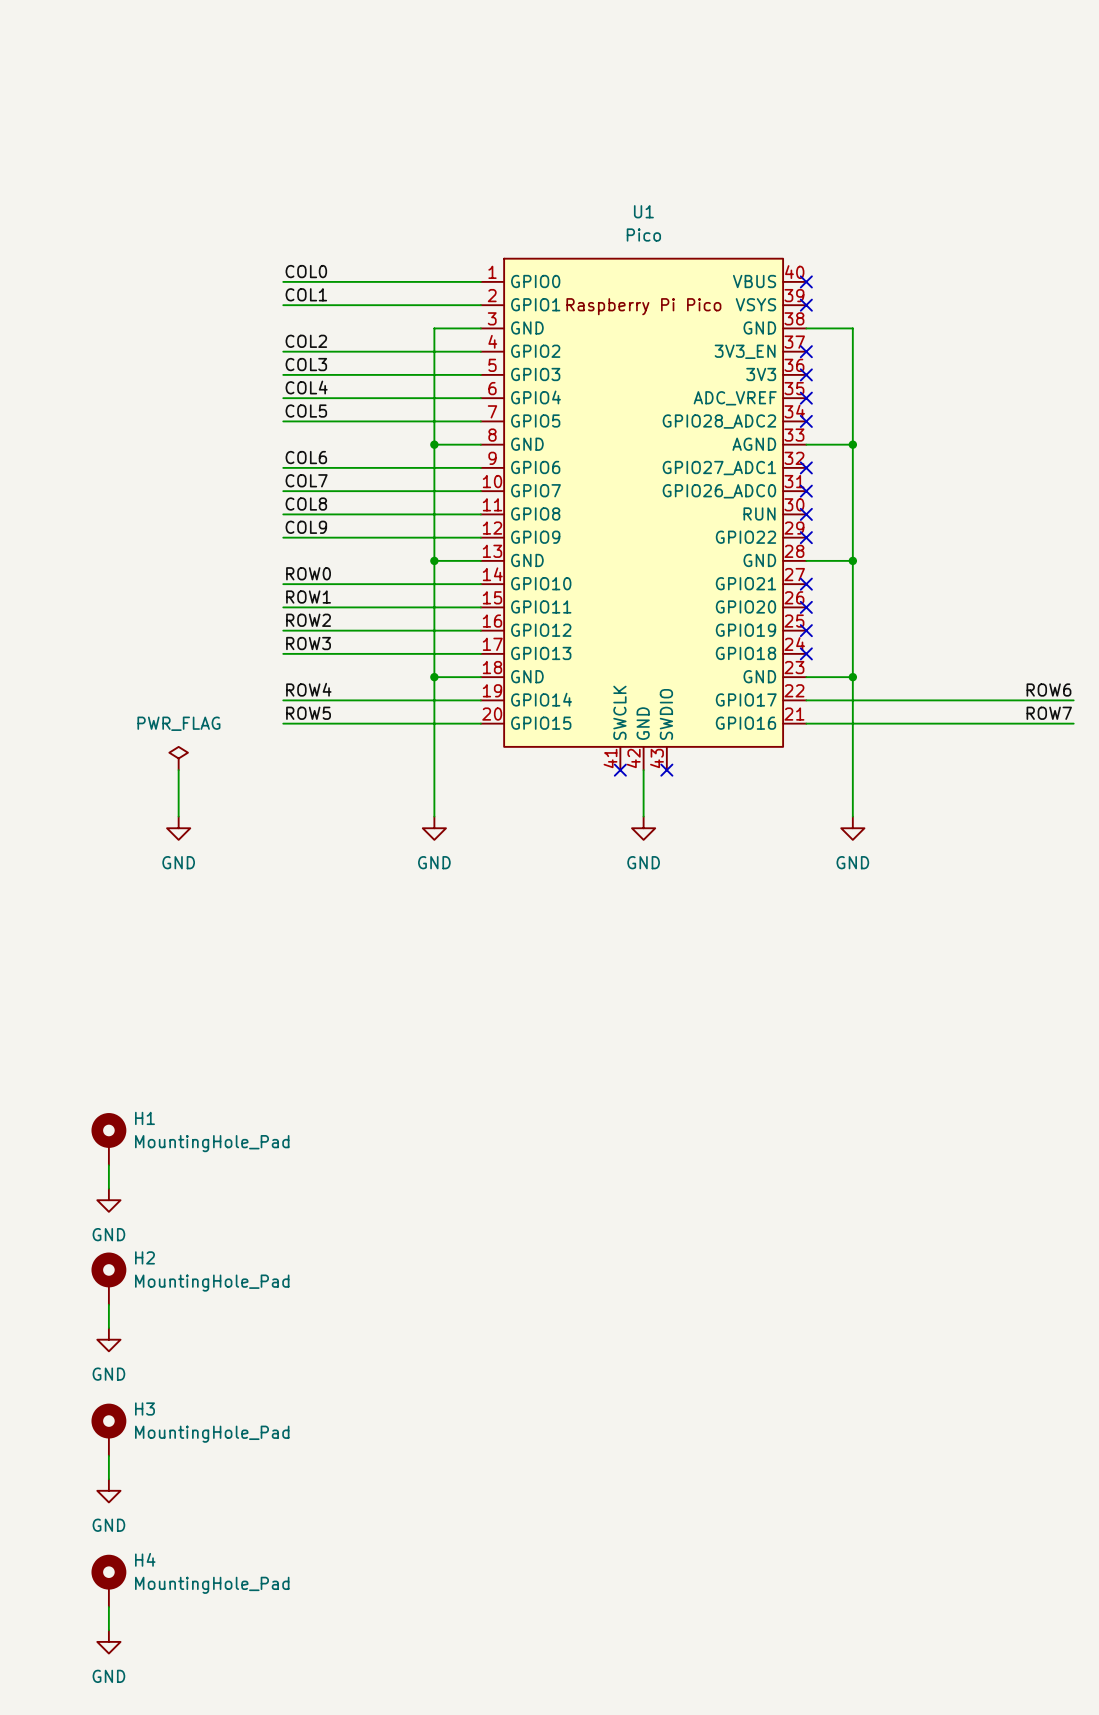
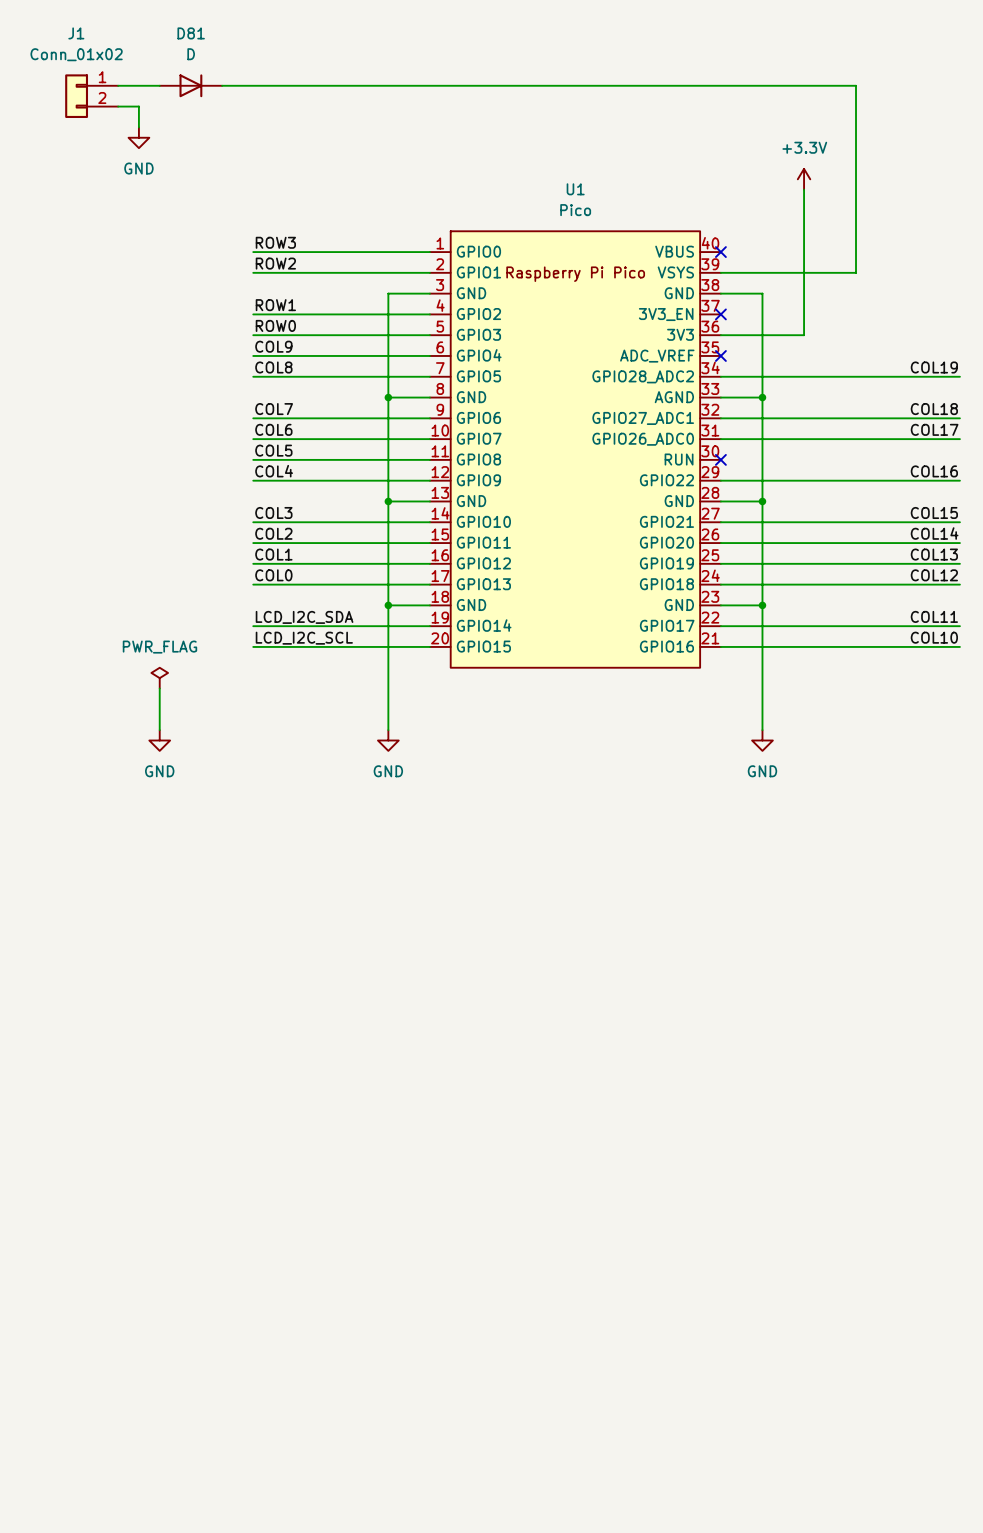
wire: none -> (118, 85) (159, 85)
D81: none -> D (190, 85)
wire: none -> (222, 85) (856, 85) (856, 272) (720, 272)
J1: none -> Conn_01x02 (91, 96)
wire: none -> (118, 106) (138, 106) (138, 127)
power symbol: none -> GND (138, 137)
power symbol: none -> +3.3V (804, 179)
wire: none -> (804, 189) (804, 335) (720, 335)
U1 symbol: [480, 258, 807, 771] -> [429, 231, 721, 668]
label: COL0 (306, 271) -> ROW3 (275, 242)
label: COL1 (306, 294) -> ROW2 (275, 263)
no-connect mark: (806, 305) -> none
label: COL2 (306, 341) -> ROW1 (275, 305)
label: COL3 (306, 364) -> ROW0 (275, 325)
no-connect mark: (806, 374) -> none
label: COL4 (306, 387) -> COL9 (273, 346)
label: COL5 (306, 411) -> COL8 (273, 367)
label: none -> COL19 (934, 367)
wire: none -> (720, 376) (959, 376)
no-connect mark: (806, 421) -> none
label: COL6 (306, 457) -> COL7 (274, 409)
label: none -> COL18 (934, 409)
wire: none -> (720, 418) (959, 418)
no-connect mark: (806, 467) -> none
label: COL7 (306, 480) -> COL6 (273, 429)
label: none -> COL17 (934, 429)
wire: none -> (720, 439) (959, 439)
no-connect mark: (806, 491) -> none
label: COL8 (306, 504) -> COL5 (273, 450)
label: COL9 (306, 527) -> COL4 (274, 471)
label: none -> COL16 (934, 471)
wire: none -> (720, 480) (959, 480)
no-connect mark: (806, 537) -> none
label: ROW0 (308, 573) -> COL3 (273, 512)
label: none -> COL15 (934, 512)
wire: none -> (720, 522) (959, 522)
no-connect mark: (806, 584) -> none
label: none -> COL14 (934, 533)
label: ROW1 (308, 597) -> COL2 (273, 533)
wire: none -> (720, 543) (959, 543)
no-connect mark: (806, 607) -> none
label: ROW2 (308, 620) -> COL1 (273, 554)
label: none -> COL13 (934, 554)
wire: none -> (720, 563) (959, 563)
no-connect mark: (806, 630) -> none
label: ROW3 (308, 643) -> COL0 (273, 575)
label: none -> COL12 (934, 575)
wire: none -> (720, 584) (959, 584)
no-connect mark: (806, 653) -> none
label: ROW4 (308, 689) -> LCD_I2C_SDA (304, 617)
label: ROW6 (1048, 690) -> COL11 (934, 616)
label: ROW5 (308, 713) -> LCD_I2C_SCL (304, 638)
label: ROW7 (1049, 713) -> COL10 (934, 637)
no-connect mark: (620, 770) -> none
wire: (643, 770) (643, 816) -> none
no-connect mark: (666, 770) -> none
power symbol: GND (643, 828) -> none
H1: MountingHole_Pad (108, 1139) -> none
wire: (108, 1165) (108, 1188) -> none
power symbol: GND (108, 1200) -> none
H2: MountingHole_Pad (108, 1278) -> none
wire: (108, 1304) (108, 1328) -> none
power symbol: GND (108, 1339) -> none
H3: MountingHole_Pad (108, 1429) -> none
wire: (108, 1455) (108, 1479) -> none
power symbol: GND (108, 1490) -> none
H4: MountingHole_Pad (108, 1580) -> none
wire: (108, 1607) (108, 1630) -> none
power symbol: GND (108, 1641) -> none

